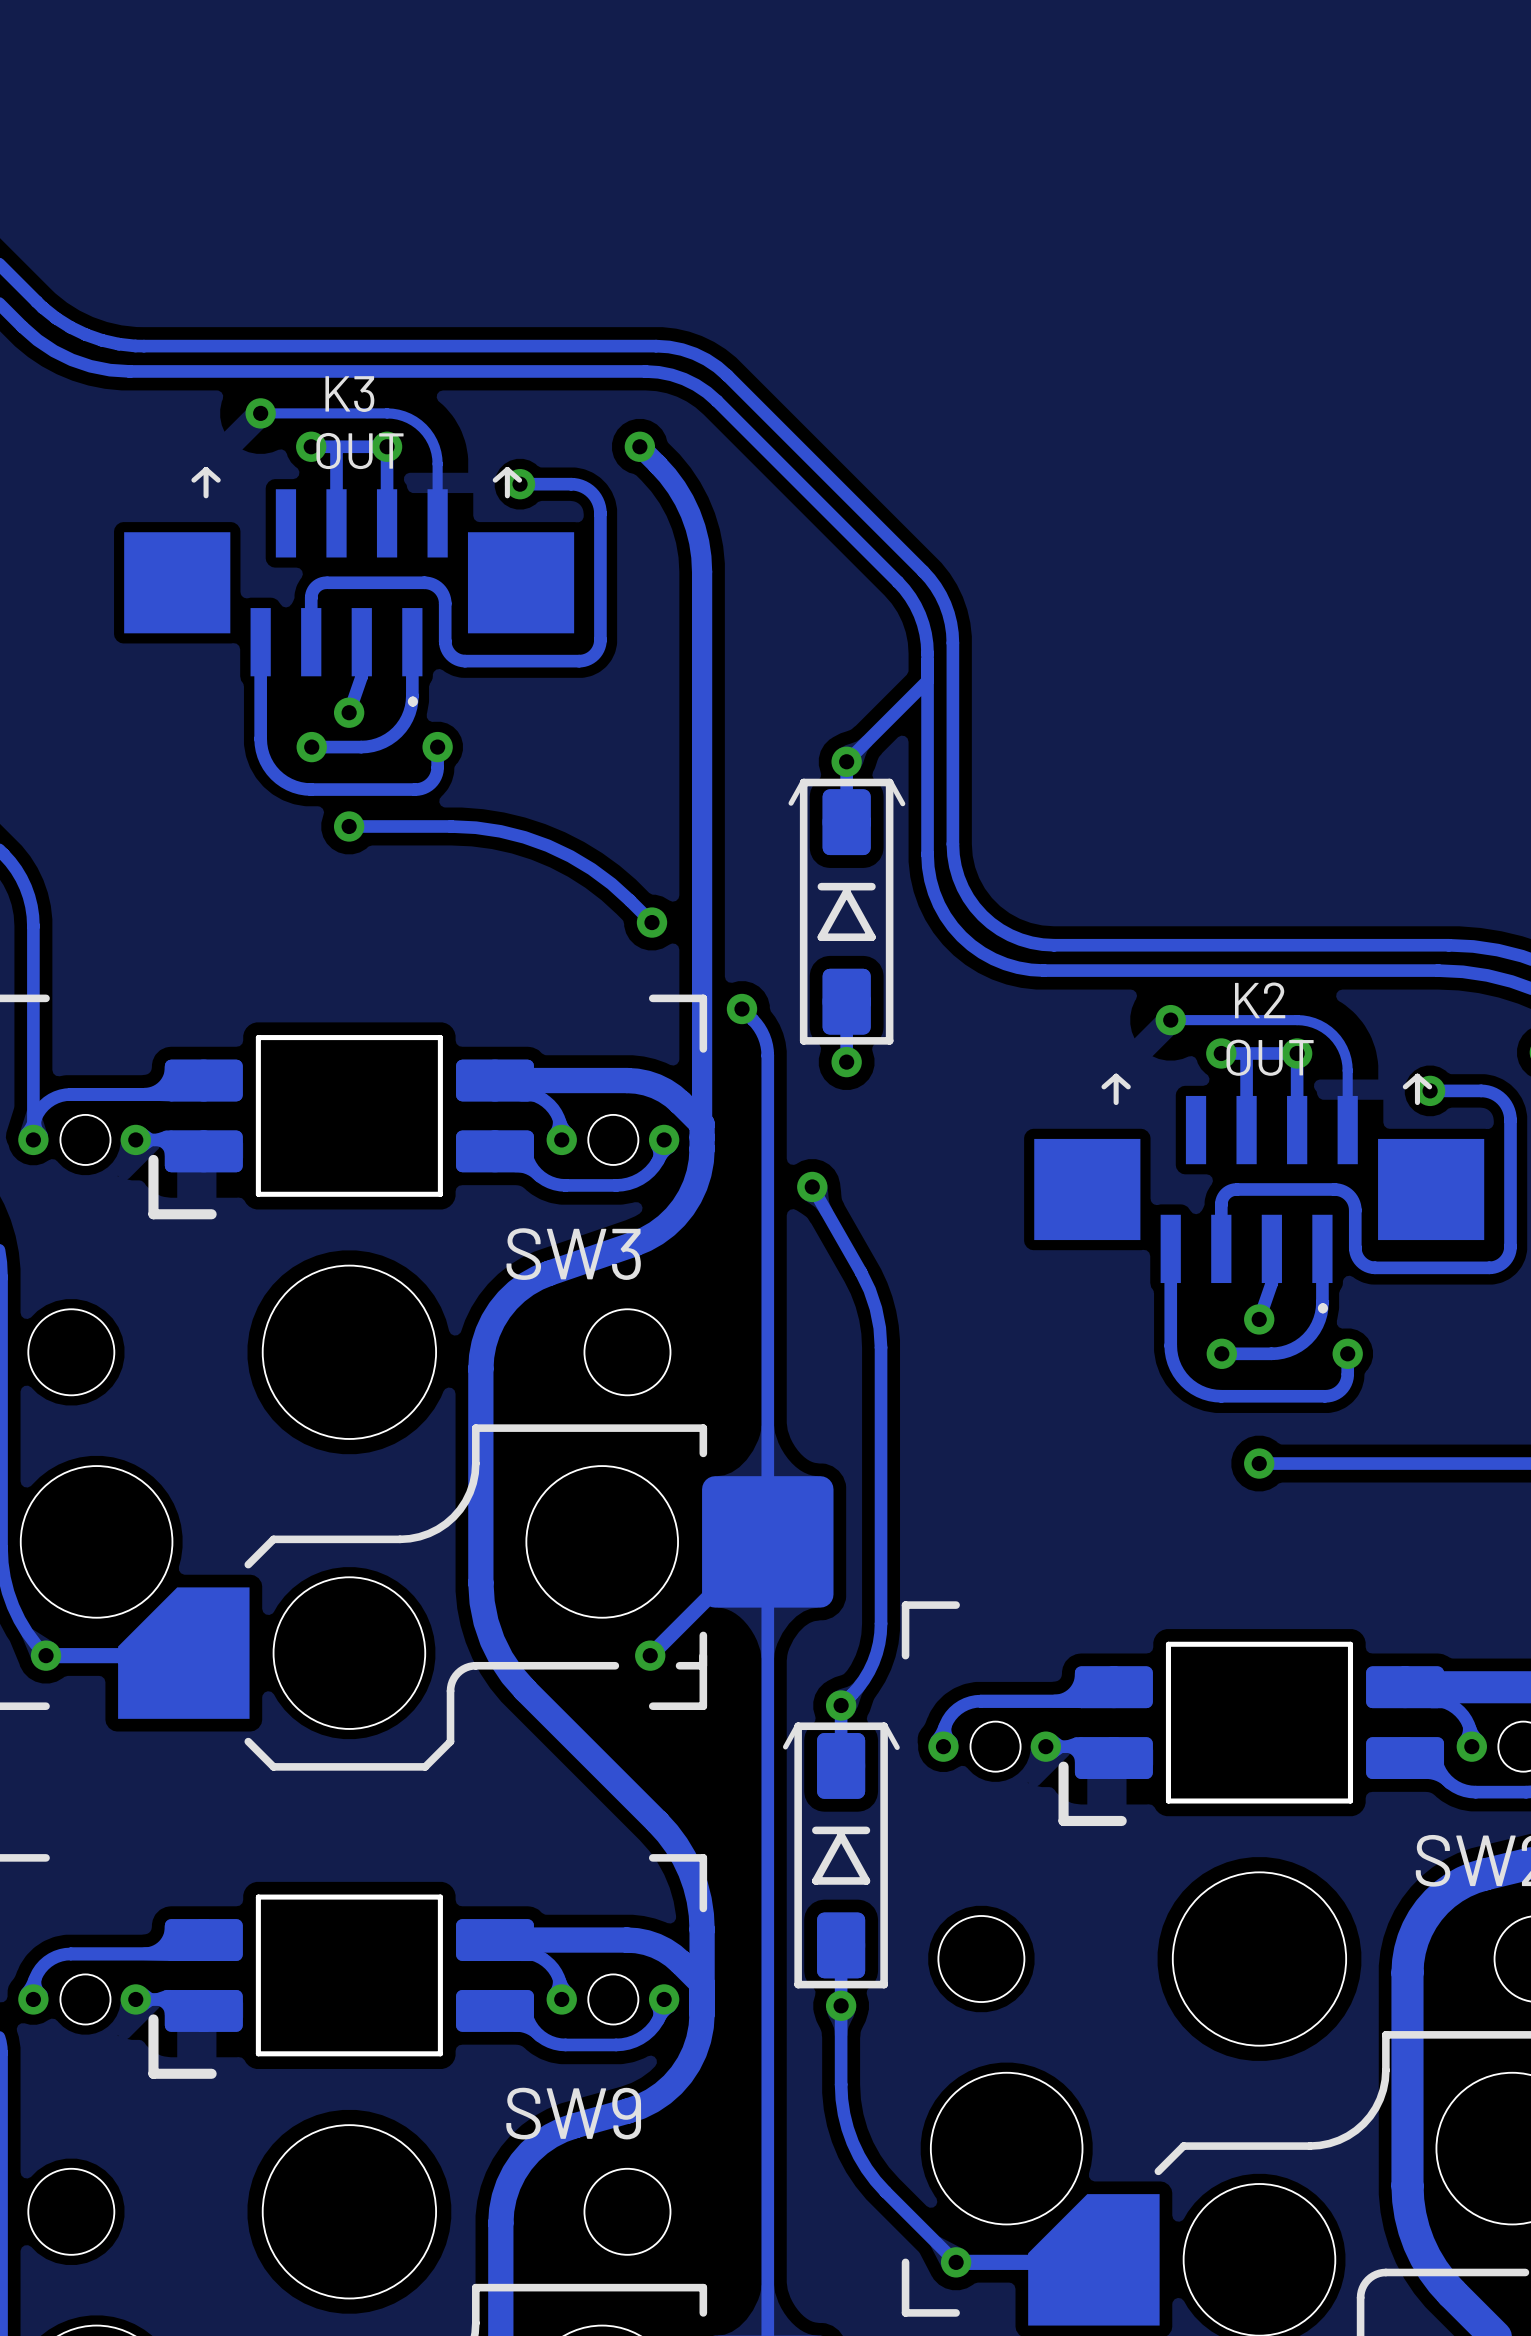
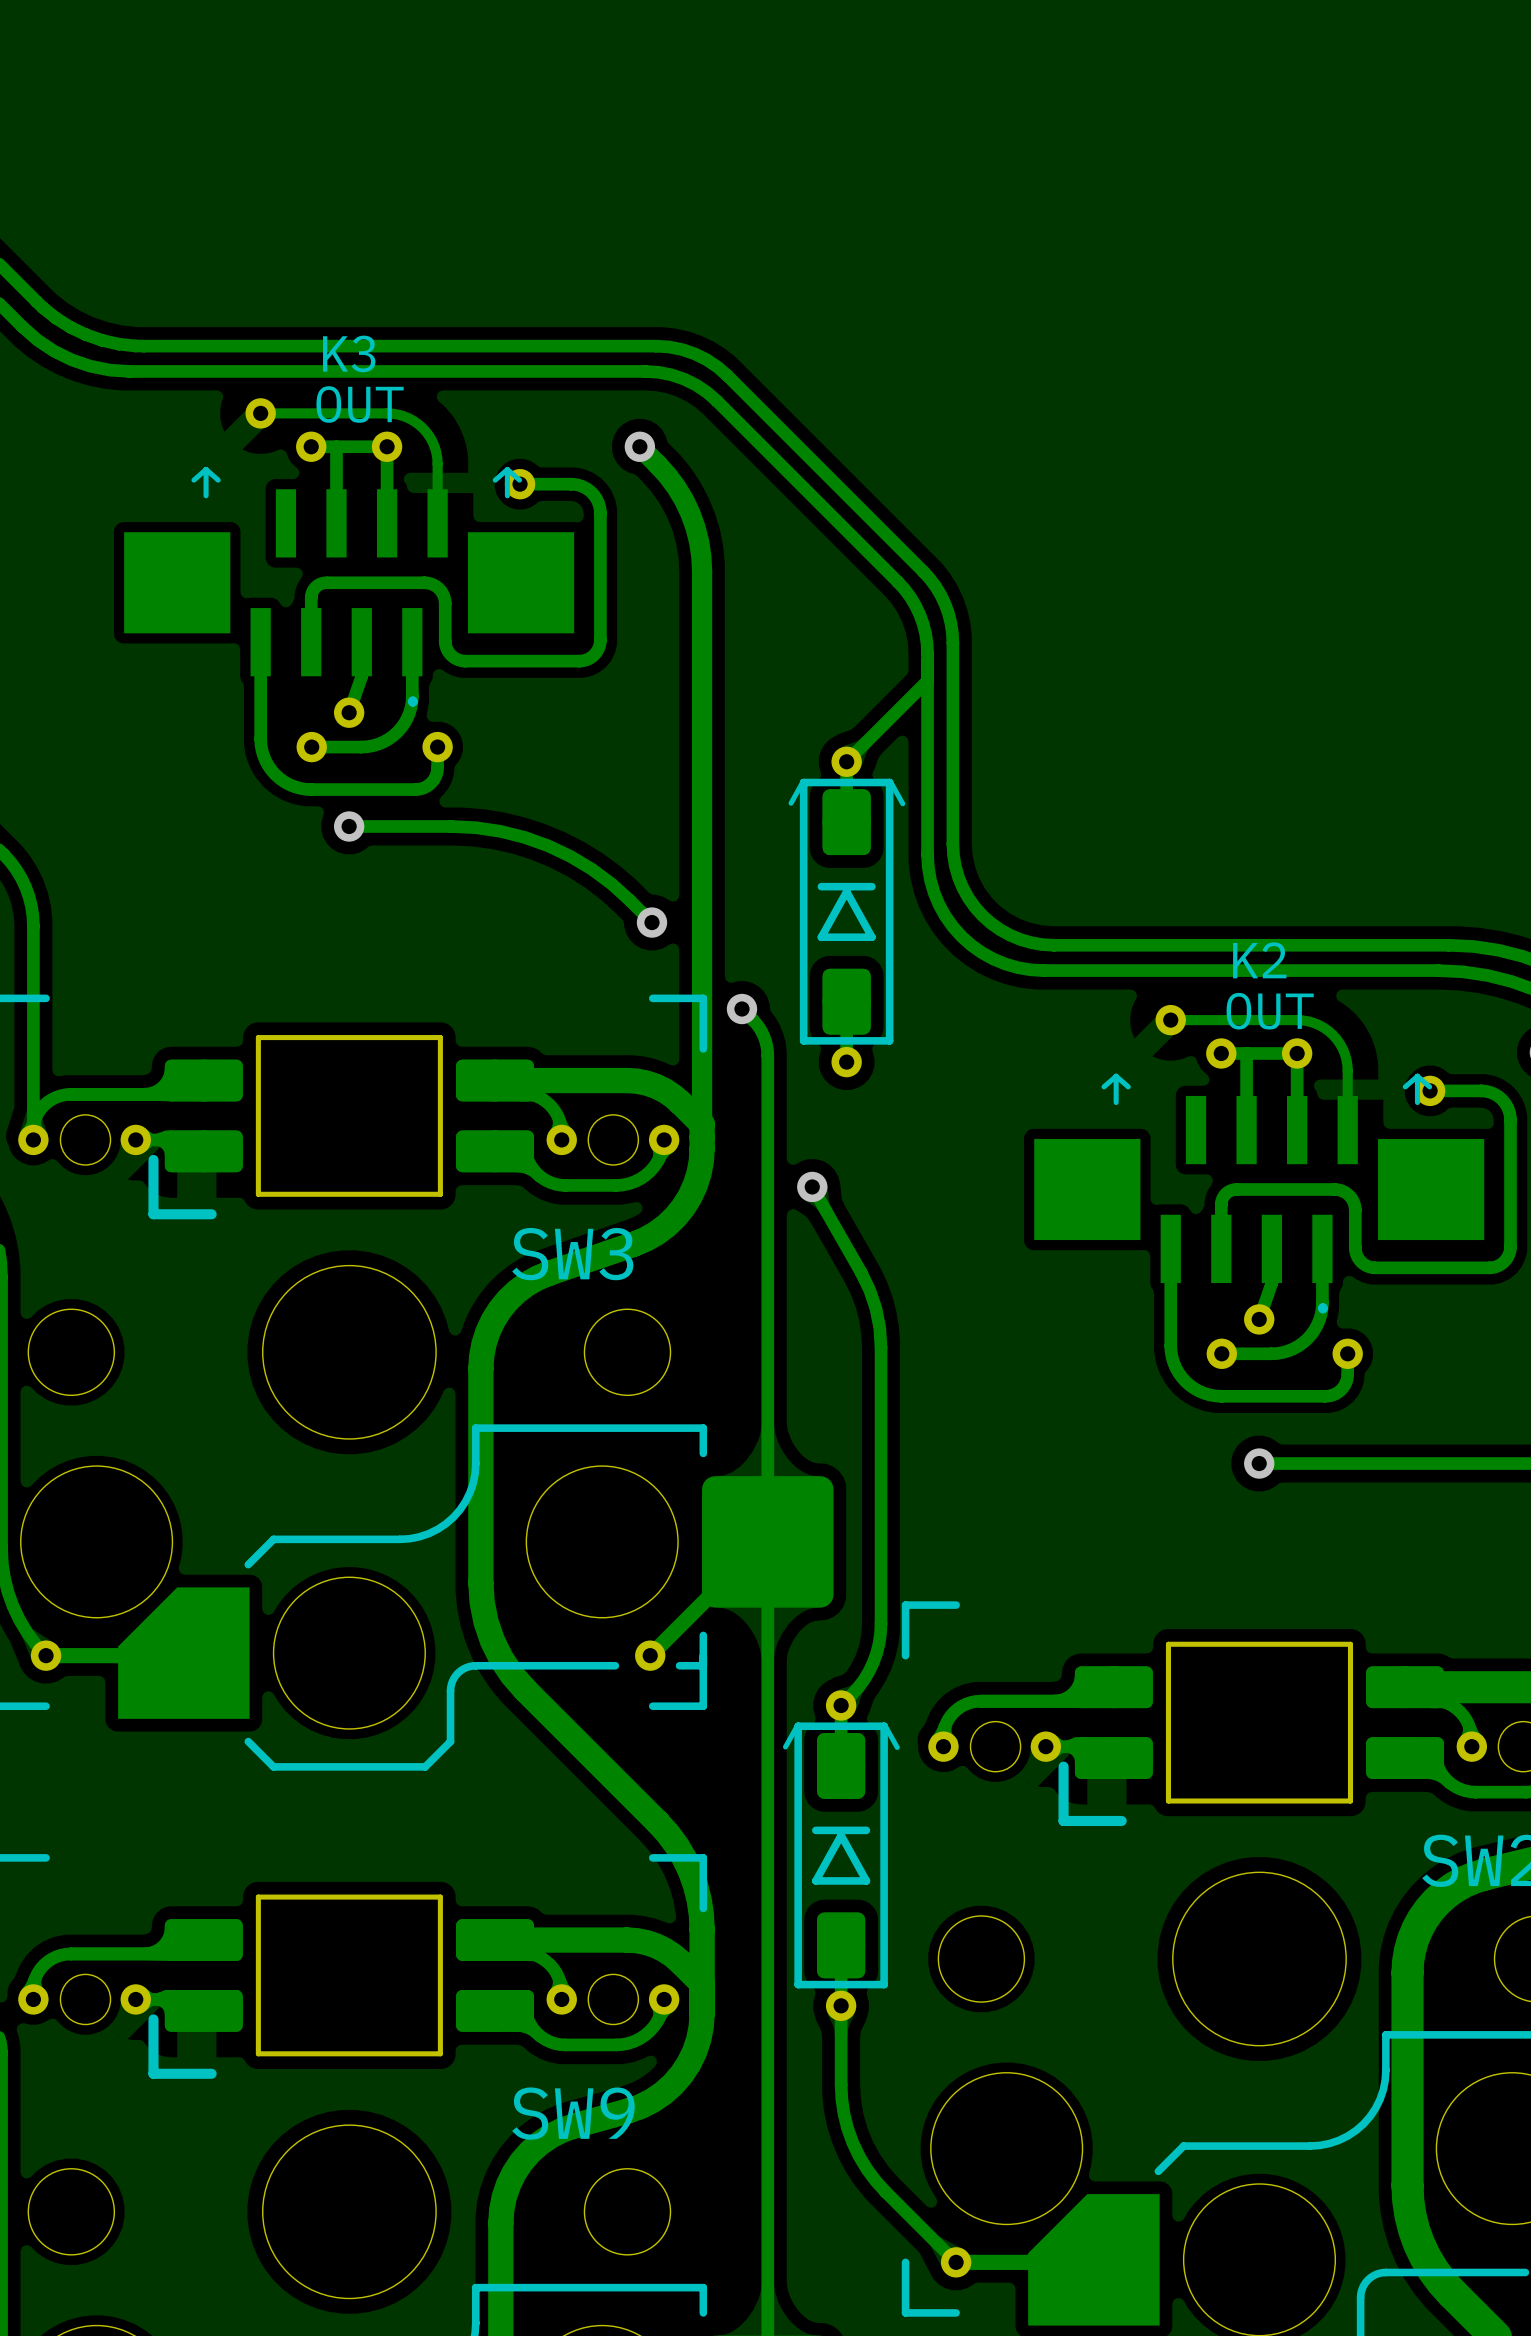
K3 name position: K3 (349, 394) -> K3 (349, 353)
K3 text position: OUT (359, 451) -> OUT (360, 404)
K2 name position: K2 (1260, 1000) -> K2 (1259, 960)
K2 text position: OUT (1270, 1057) -> OUT (1270, 1011)

